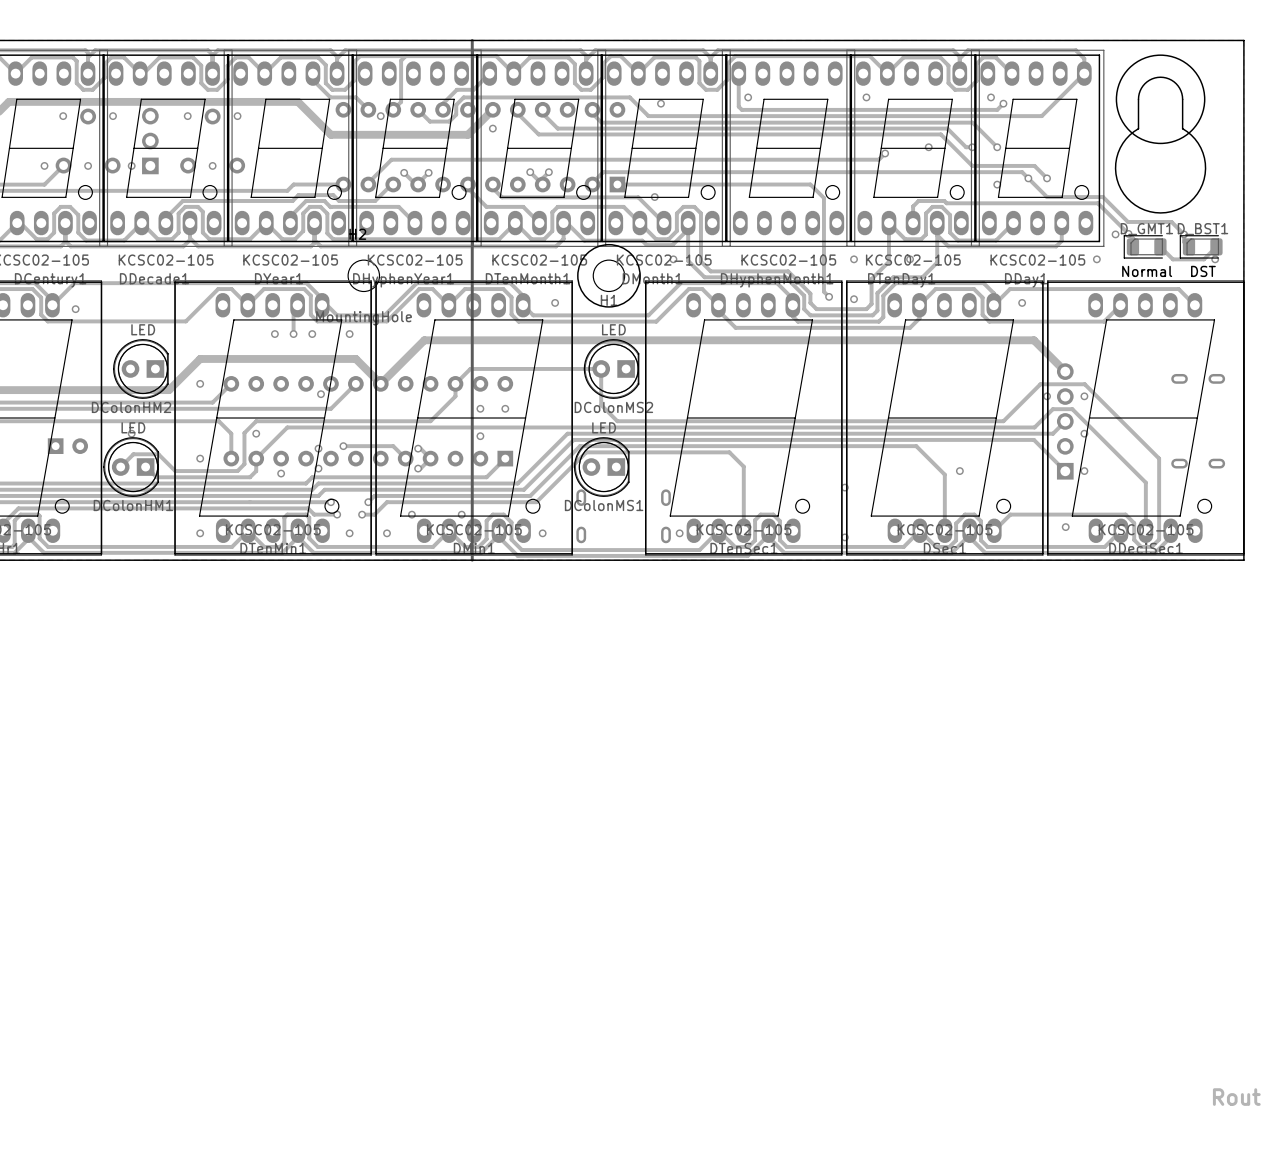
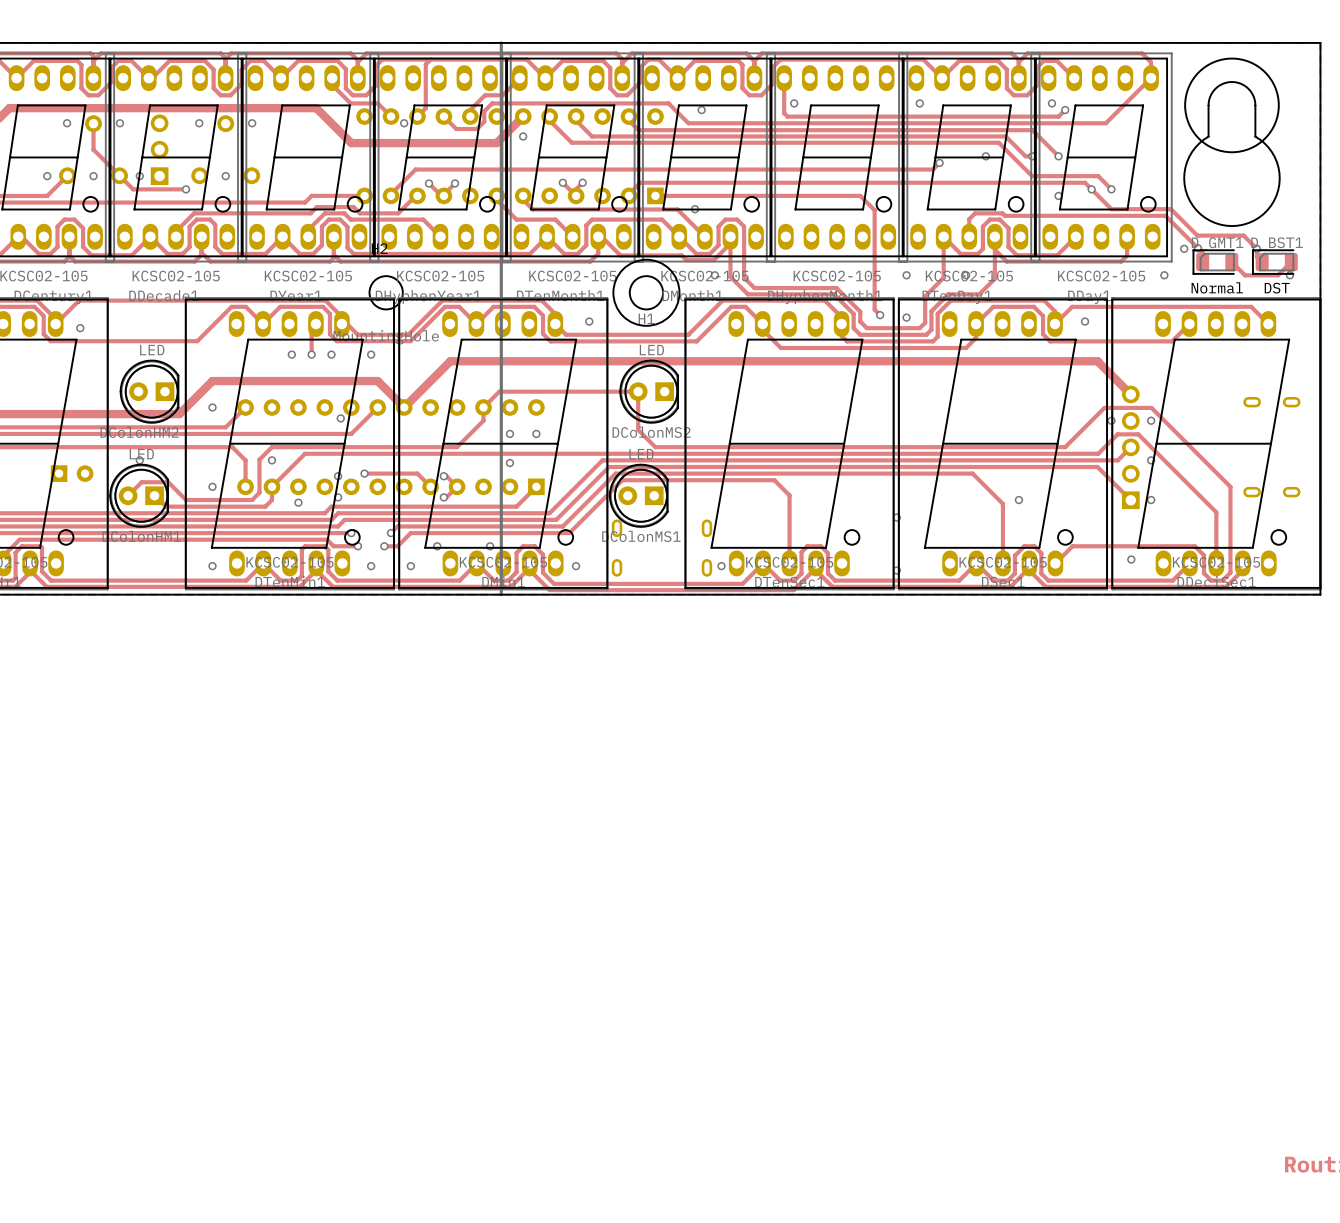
track: none -> (93, 123) (93, 149) (133, 189) (186, 189)
via: none -> (186, 189)

